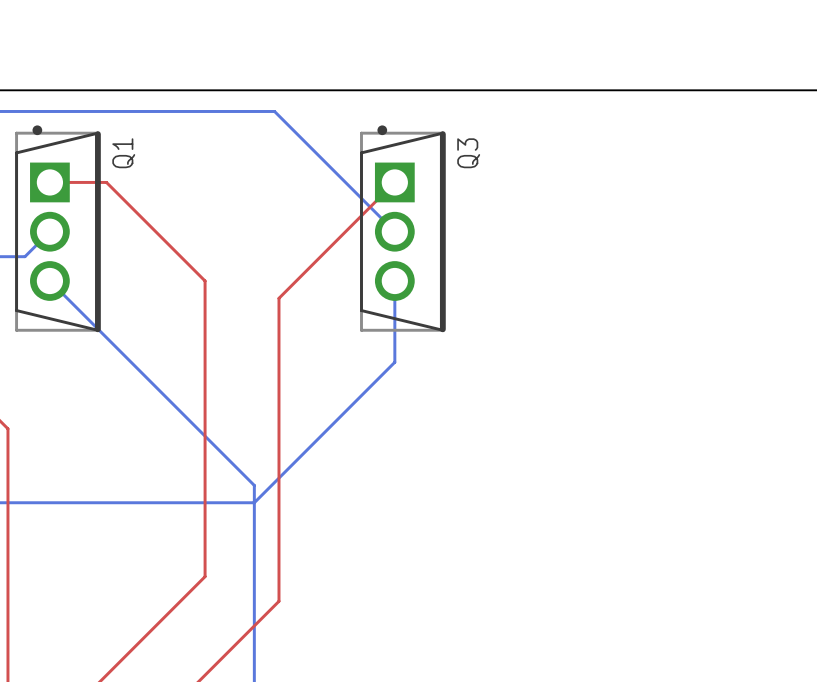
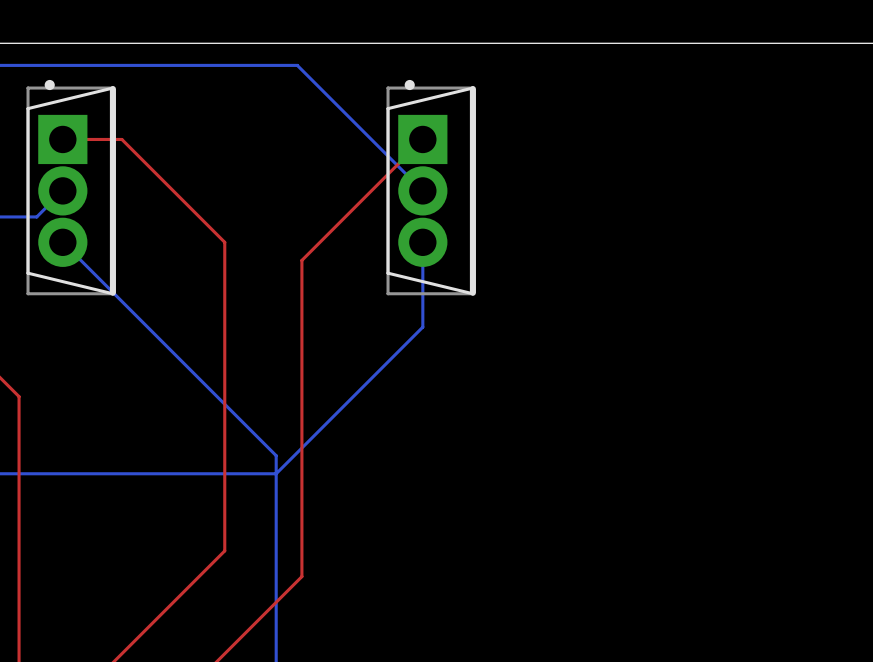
Q1: (57, 228) -> none
part: none -> (71, 187)
Q3: (402, 228) -> none
part: none -> (431, 187)

